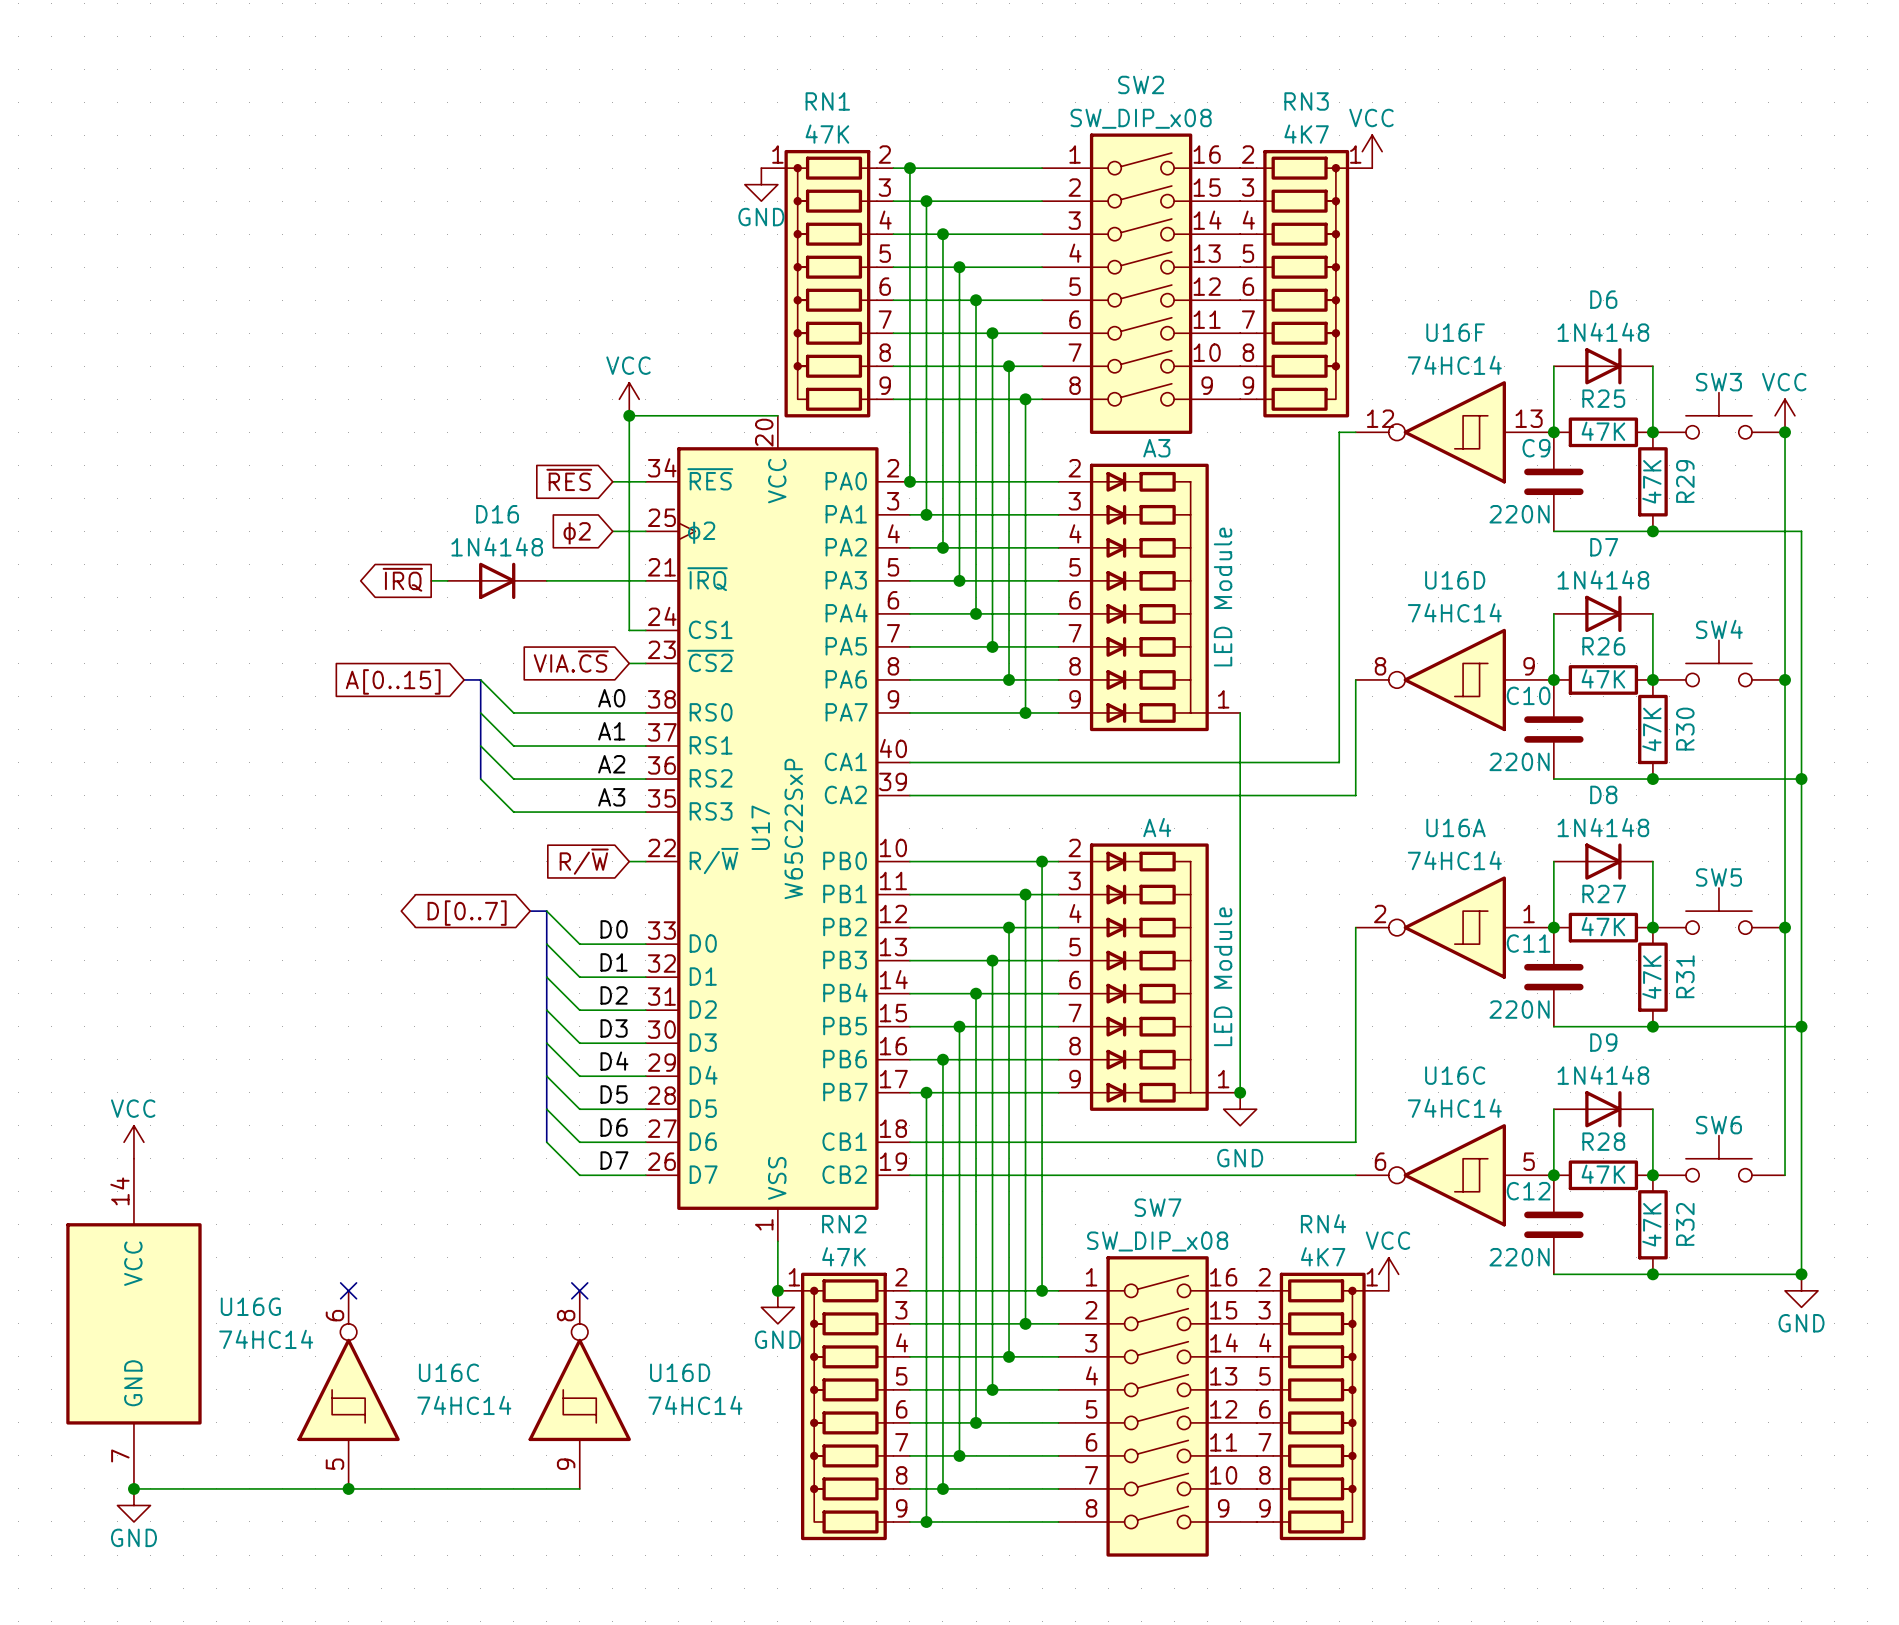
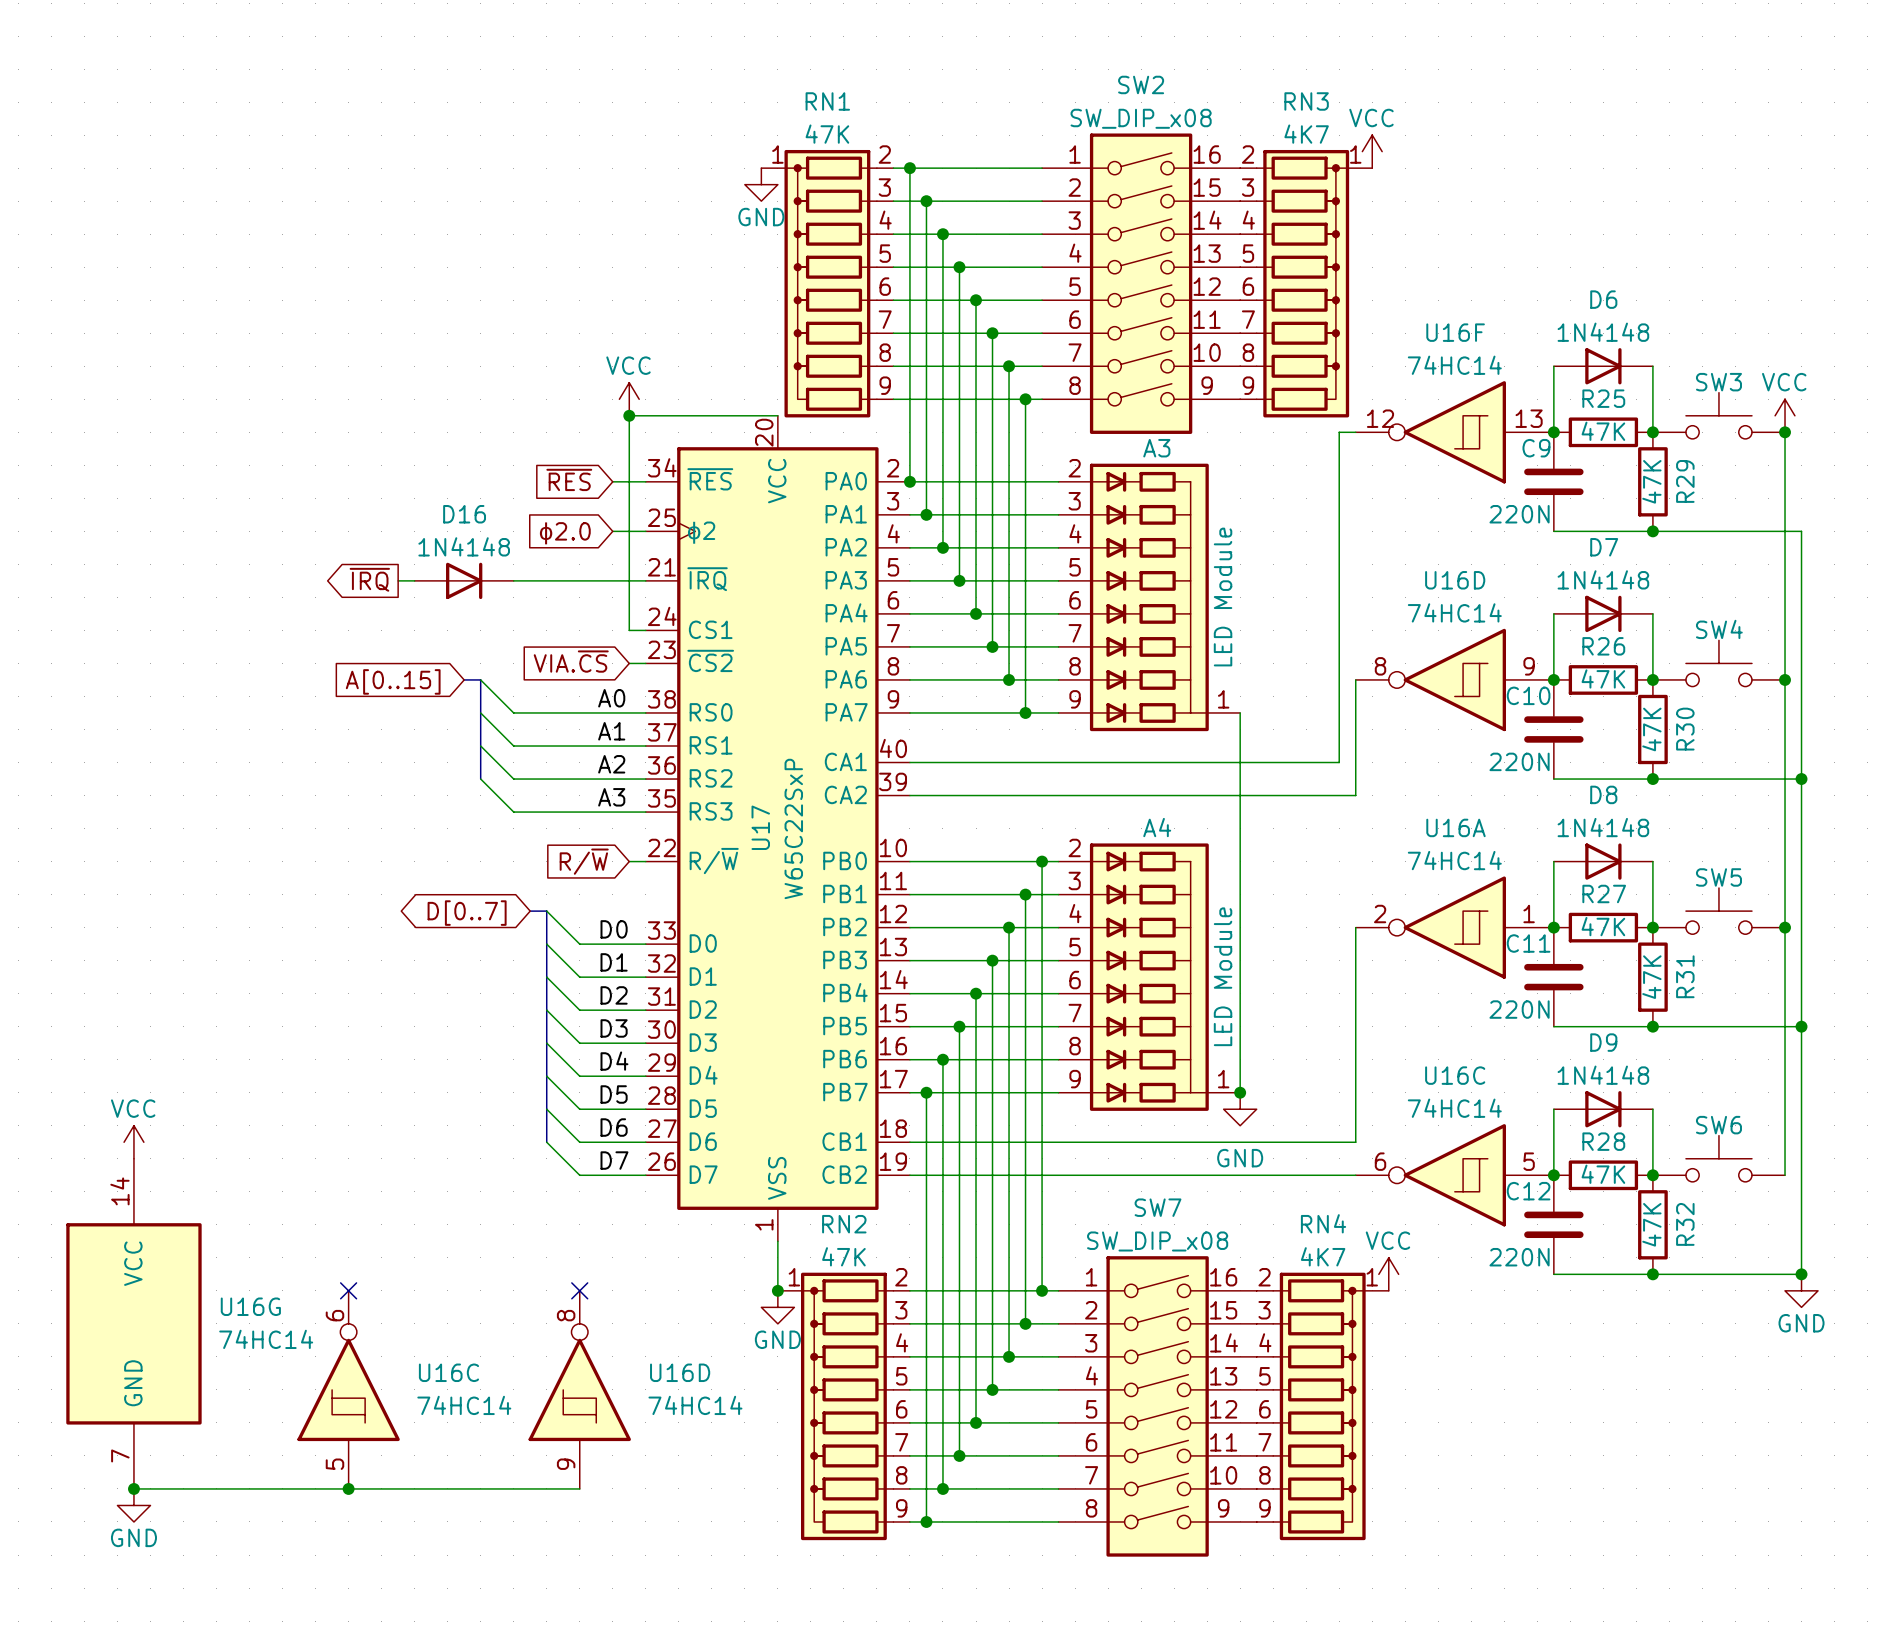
global label: ϕ2 (576, 533) -> ϕ2.0 (564, 533)
global label position: ~{IRQ} (402, 579) -> ~{IRQ} (369, 579)
D16 position: (497, 580) -> (464, 580)

